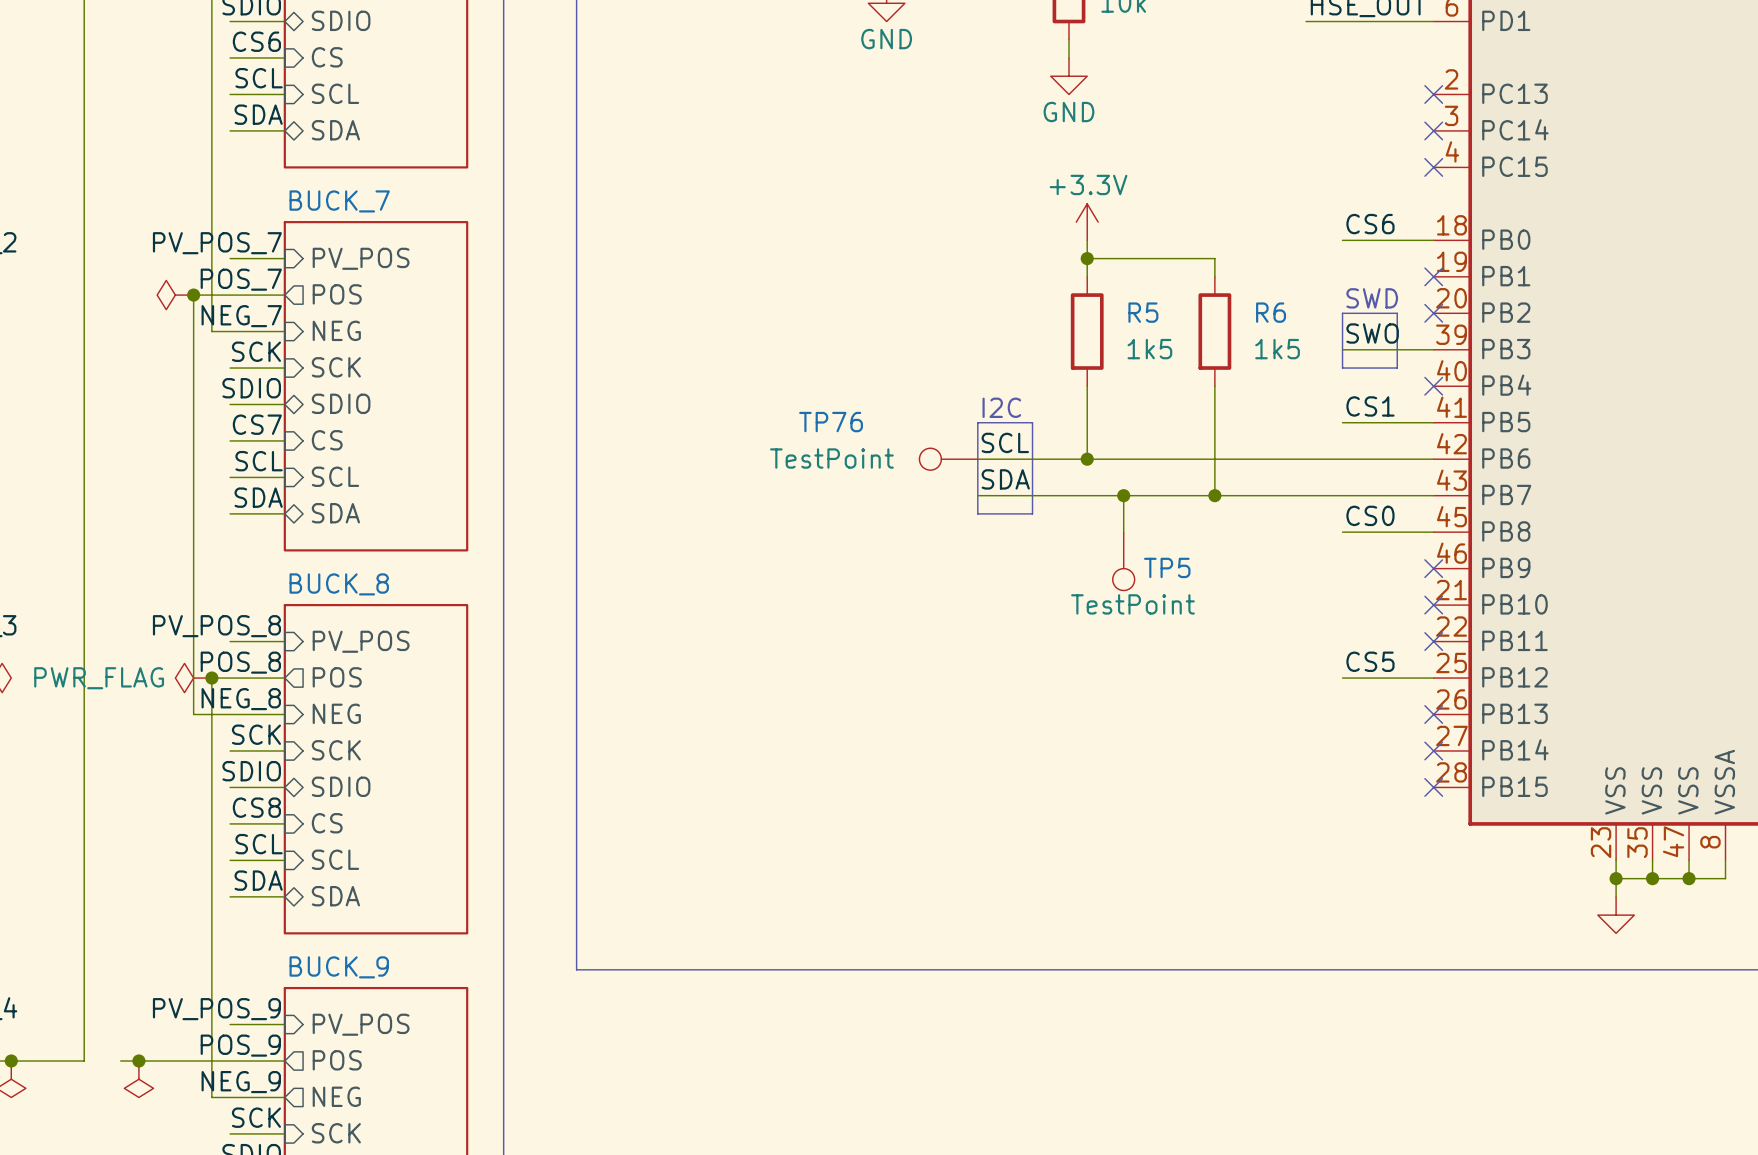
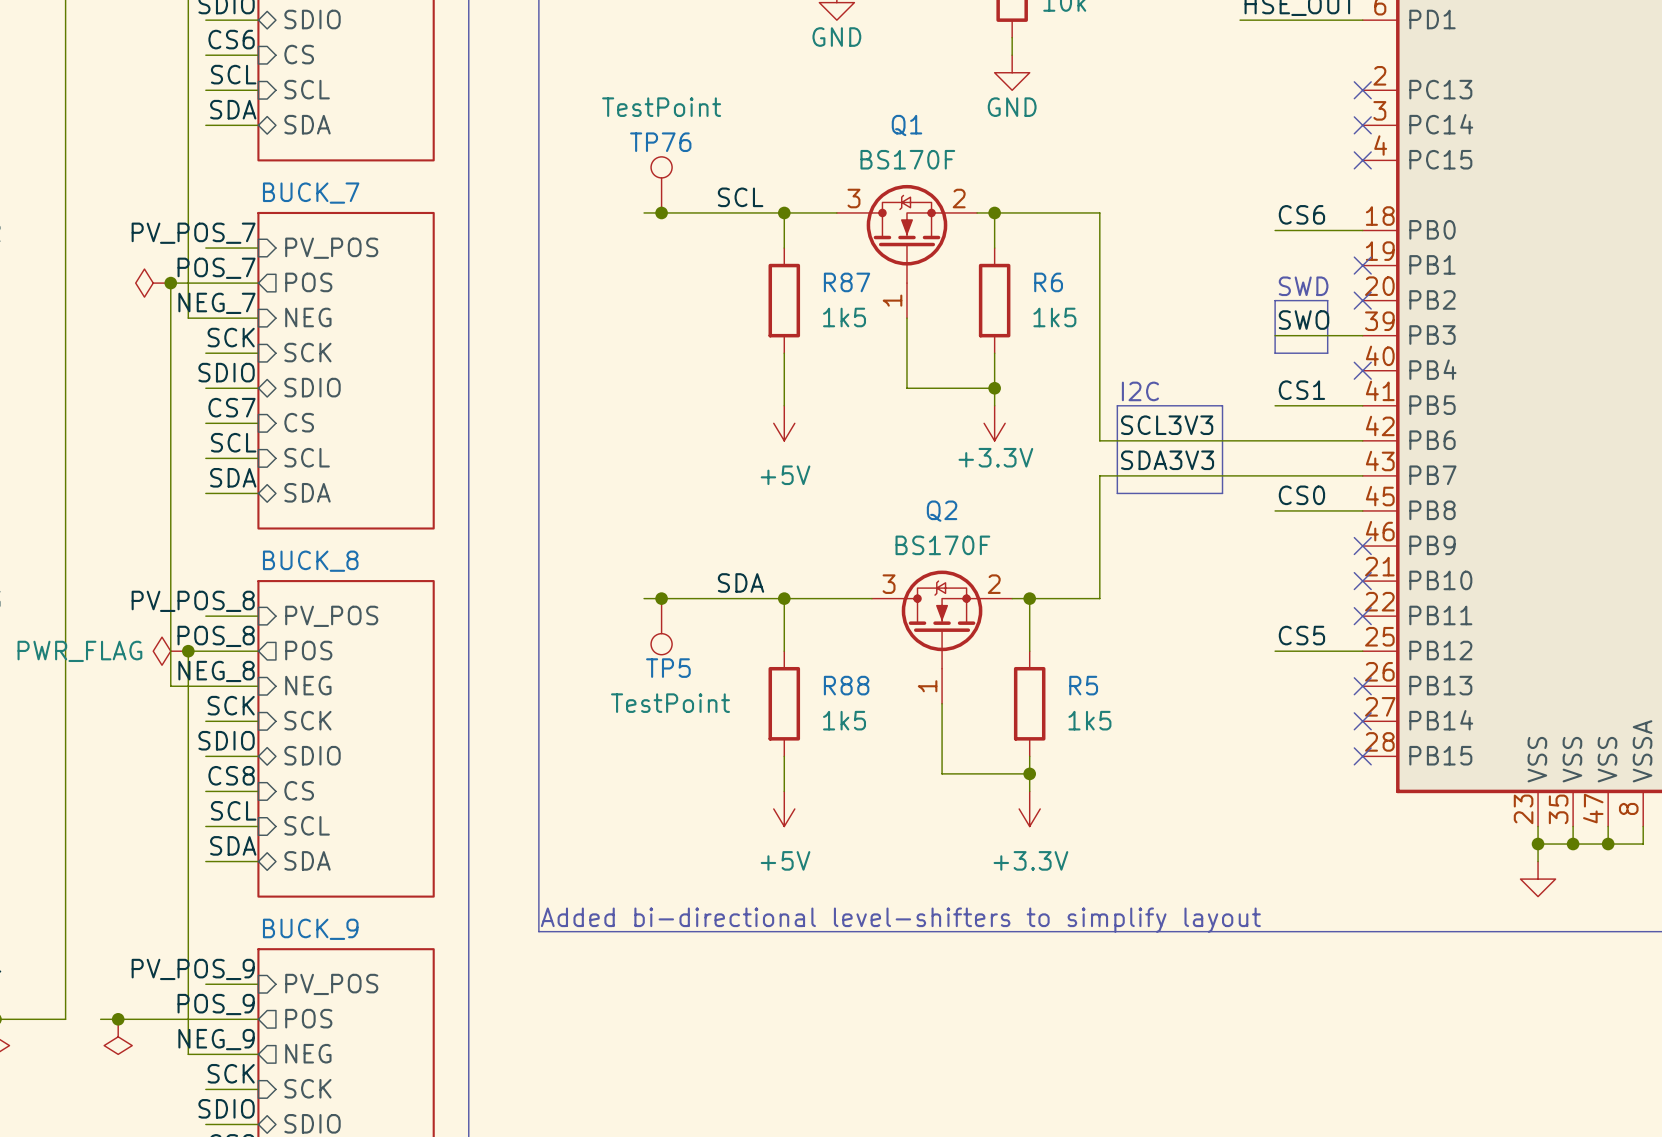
wire: none -> (644, 212) (836, 212)
junction: none -> (661, 212)
wire: none -> (784, 212) (784, 248)
junction: none -> (784, 212)
power symbol rotation: 0° (1087, 222) -> 180° (994, 423)
power symbol position: +3.3V (1087, 222) -> +3.3V (994, 423)
wire: (1087, 240) (1087, 276) -> (994, 212) (994, 248)
wire: (1087, 258) (1214, 258) (1214, 276) -> none
junction position: (1087, 258) -> (994, 212)
Q1: none -> BS170F (906, 251)
R87: none -> 1k5 (784, 300)
wire: none -> (906, 318) (906, 388) (994, 388)
R5 position: (1087, 331) -> (1029, 703)
R6 position: (1214, 331) -> (994, 300)
wire: none -> (784, 353) (784, 405)
wire: none -> (994, 353) (994, 405)
wire: (1087, 386) (1087, 459) -> none
wire: (1214, 386) (1214, 495) -> none
junction: none -> (994, 388)
text position: I2C (1001, 407) -> I2C (1140, 391)
TP76 name position: TP76 (831, 422) -> TP76 (660, 142)
line: (977, 422) (977, 513) (1032, 513) (1032, 422) (977, 422) -> none
line: none -> (1117, 405) (1117, 493) (1222, 493) (1222, 405) (1117, 405)
power symbol: none -> +5V (784, 423)
label position: SCL (1005, 442) -> SCL (740, 197)
label: none -> SCL3V3 (1167, 425)
TP76 value position: TestPoint (831, 458) -> TestPoint (661, 107)
TP76 rotation: 0° (930, 459) -> 90° clockwise (661, 167)
TP76 position: (948, 459) -> (661, 184)
wire: (977, 459) (1160, 459) -> (977, 212) (1099, 212) (1099, 440)
junction: (1087, 459) -> none
label position: SDA (1005, 479) -> SDA (741, 582)
label: none -> SDA3V3 (1167, 460)
wire: (977, 495) (1160, 495) -> (1012, 598) (1099, 598) (1099, 475)
wire: (1123, 495) (1123, 532) -> (1029, 756) (1029, 791)
junction: (1123, 495) -> none
junction: (1214, 495) -> none
TP5 position: (1123, 561) -> (661, 626)
TP5 name position: TP5 (1167, 567) -> TP5 (668, 668)
TP5 value position: TestPoint (1132, 604) -> TestPoint (670, 703)
wire: none -> (644, 598) (871, 598)
junction: none -> (661, 598)
wire: none -> (784, 598) (784, 651)
junction: none -> (784, 598)
wire: none -> (1029, 598) (1029, 651)
junction: none -> (1029, 598)
Q2: none -> BS170F (942, 637)
R88: none -> 1k5 (784, 703)
wire: none -> (942, 703) (942, 773) (1029, 773)
wire: none -> (784, 756) (784, 791)
junction: none -> (1029, 773)
power symbol: none -> +5V (784, 808)
power symbol: none -> +3.3V (1029, 808)
text: none -> Added bi-directional level-shifters to simplify layout (900, 920)

